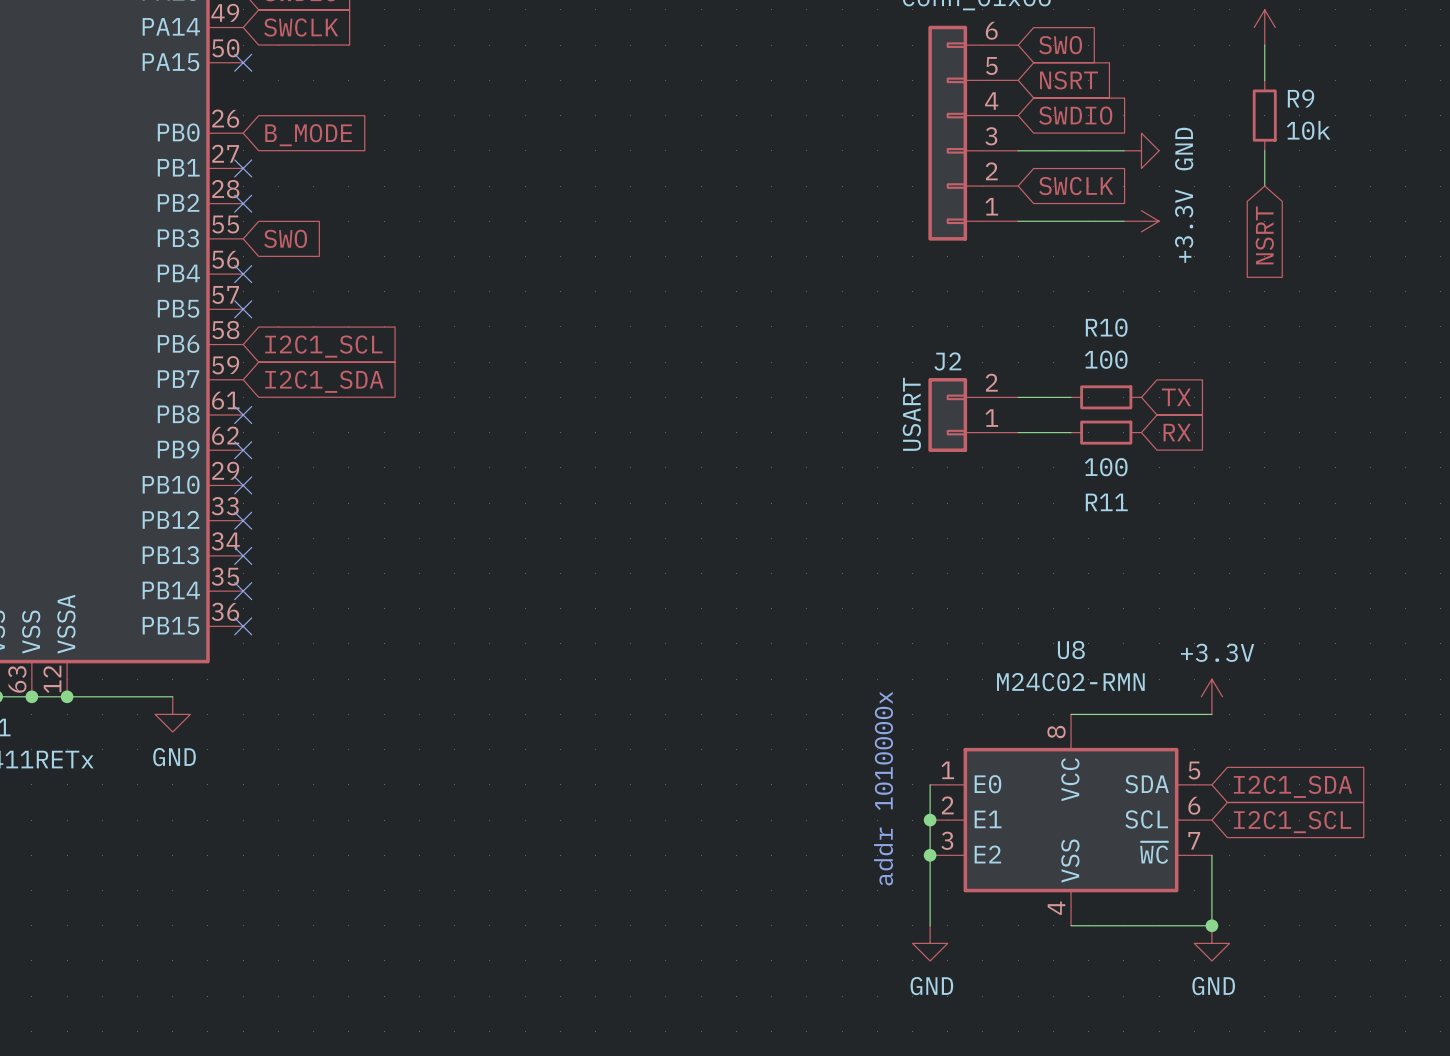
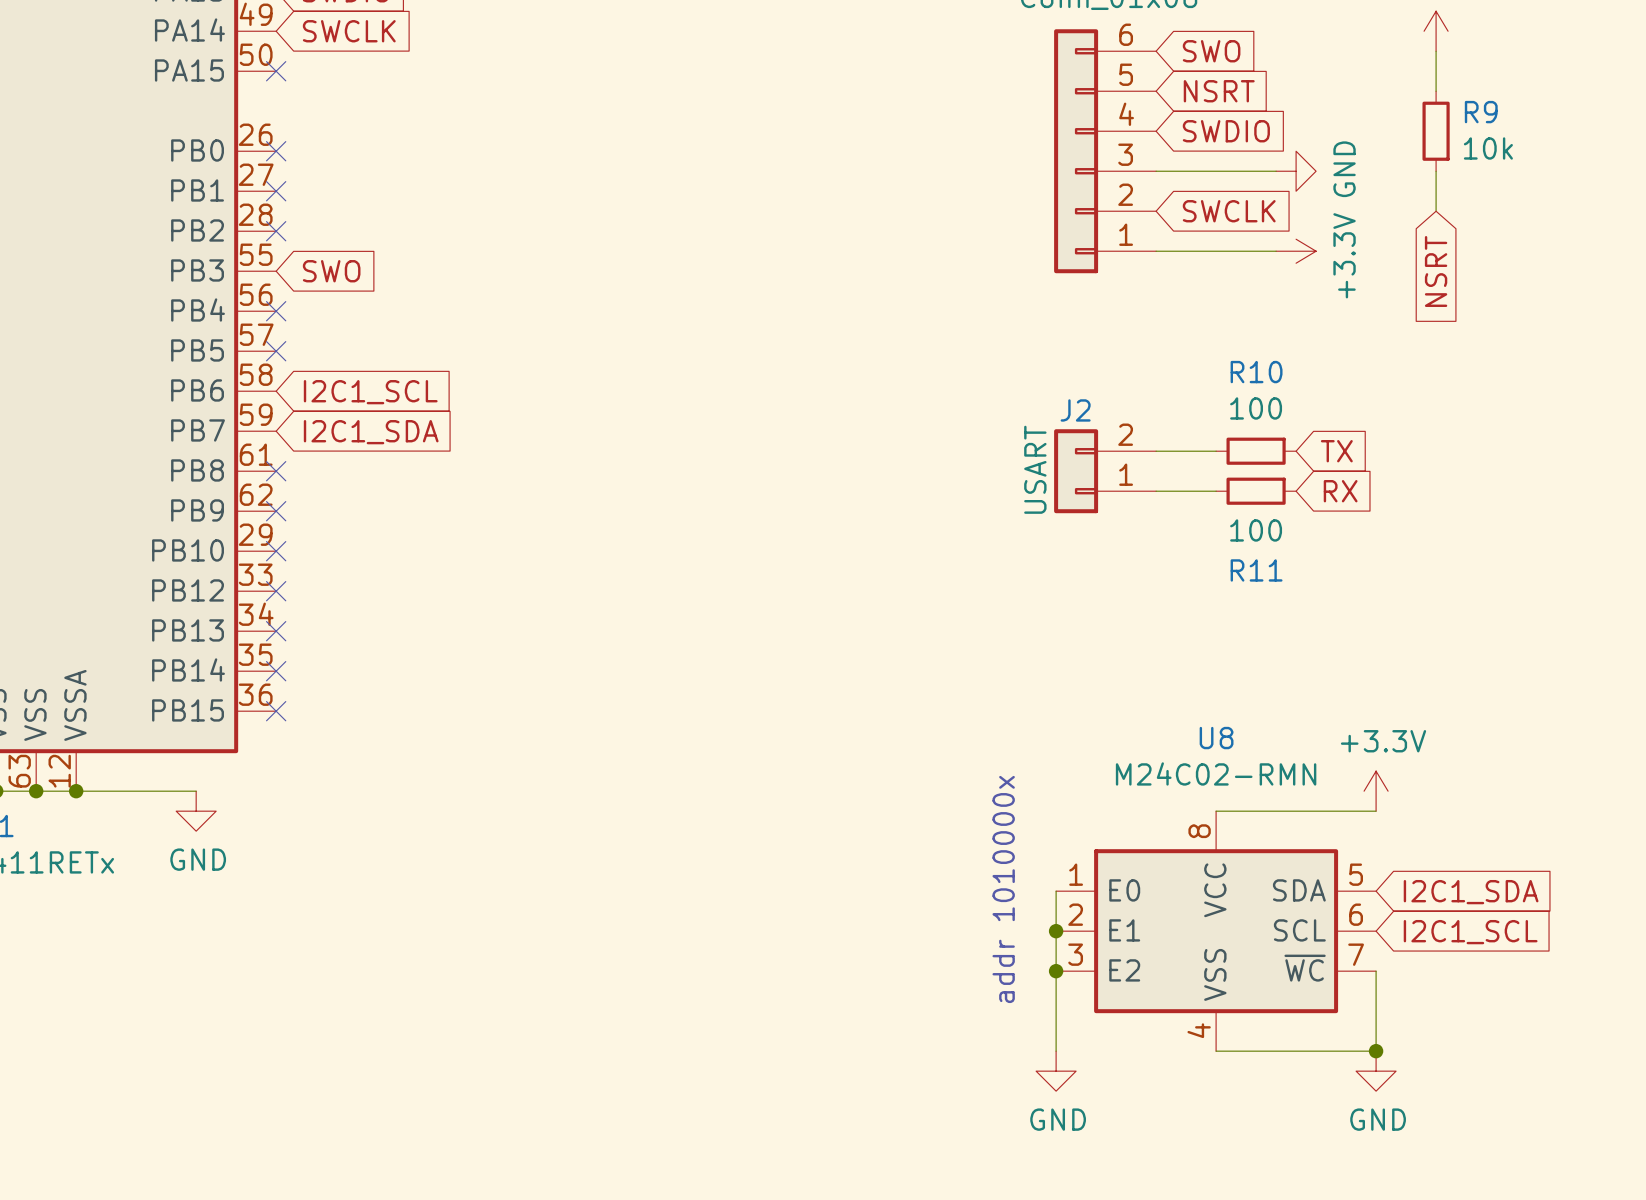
no-connect mark: none -> (276, 151)
global label: B_MODE (308, 135) -> none

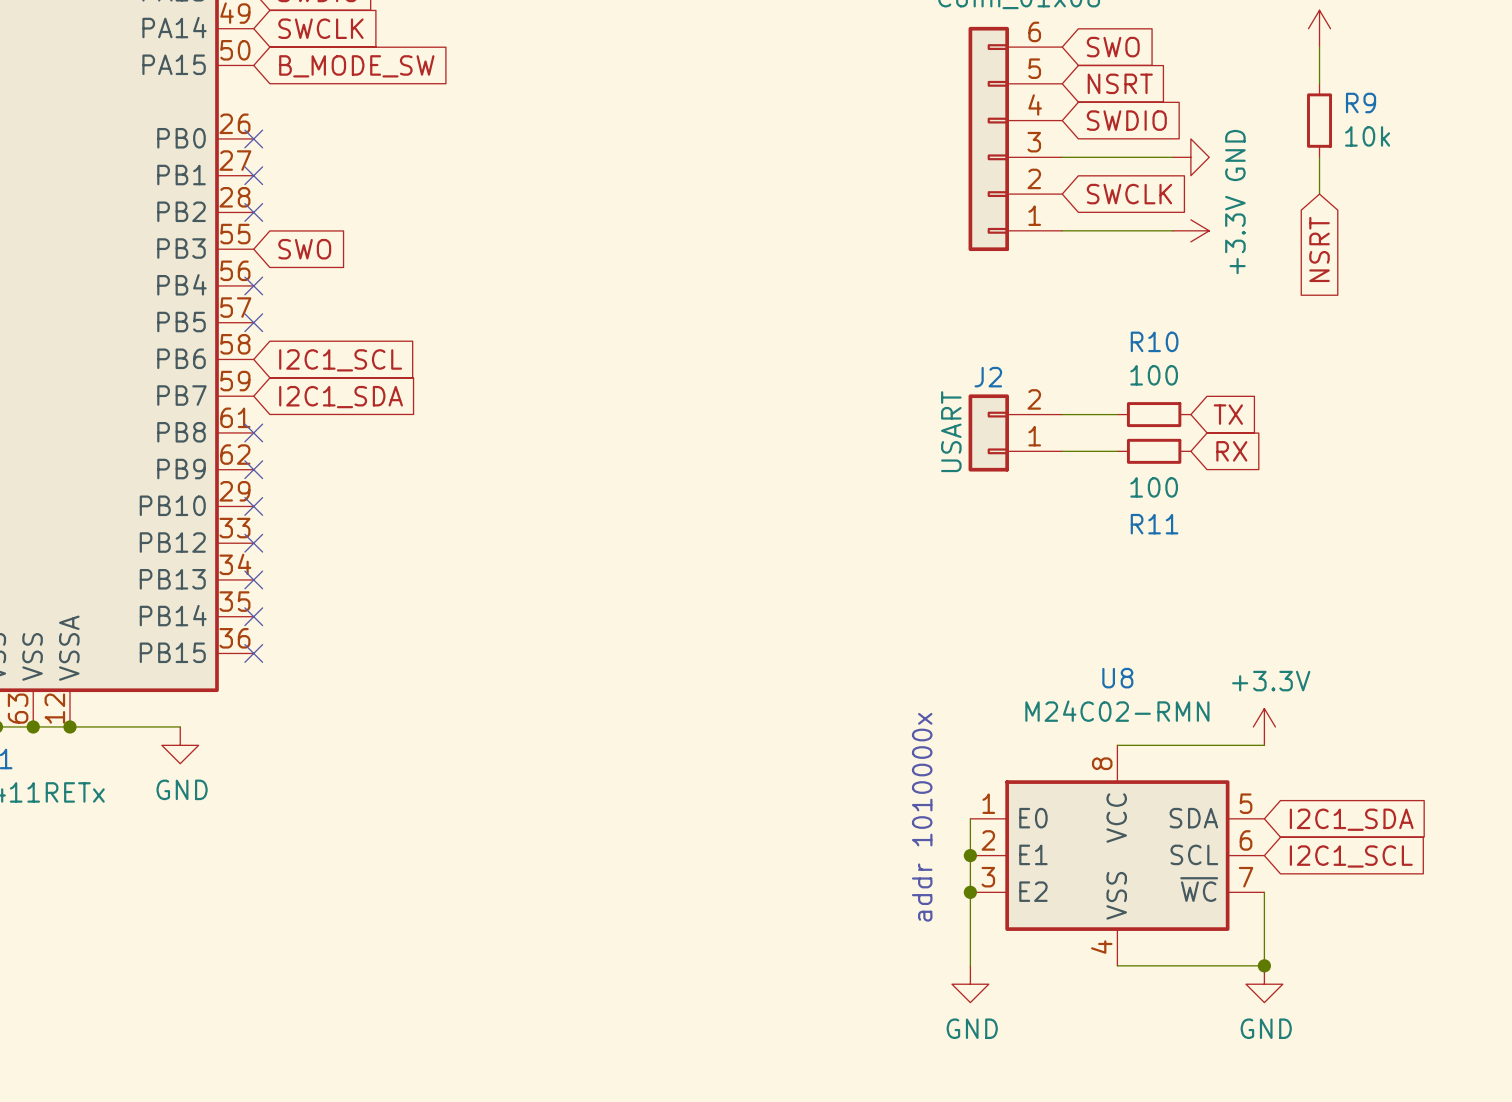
no-connect mark: (276, 71) -> none
global label: none -> B_MODE_SW (356, 66)

